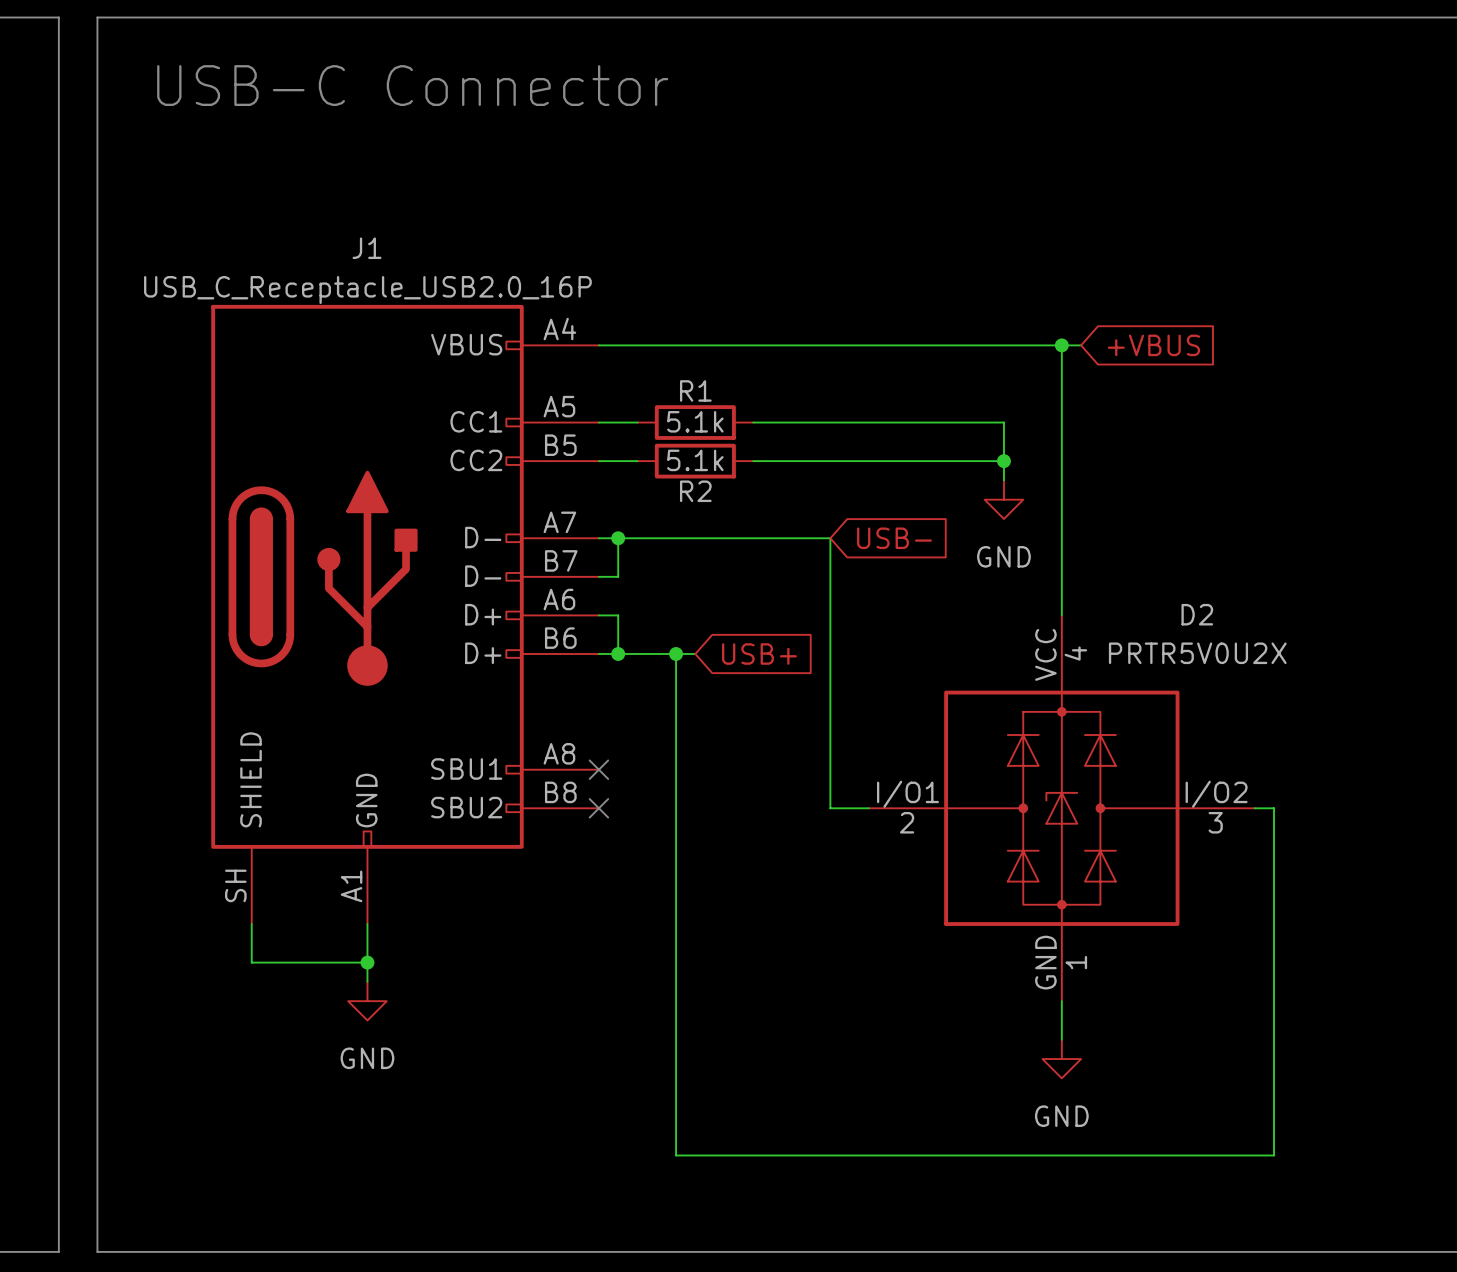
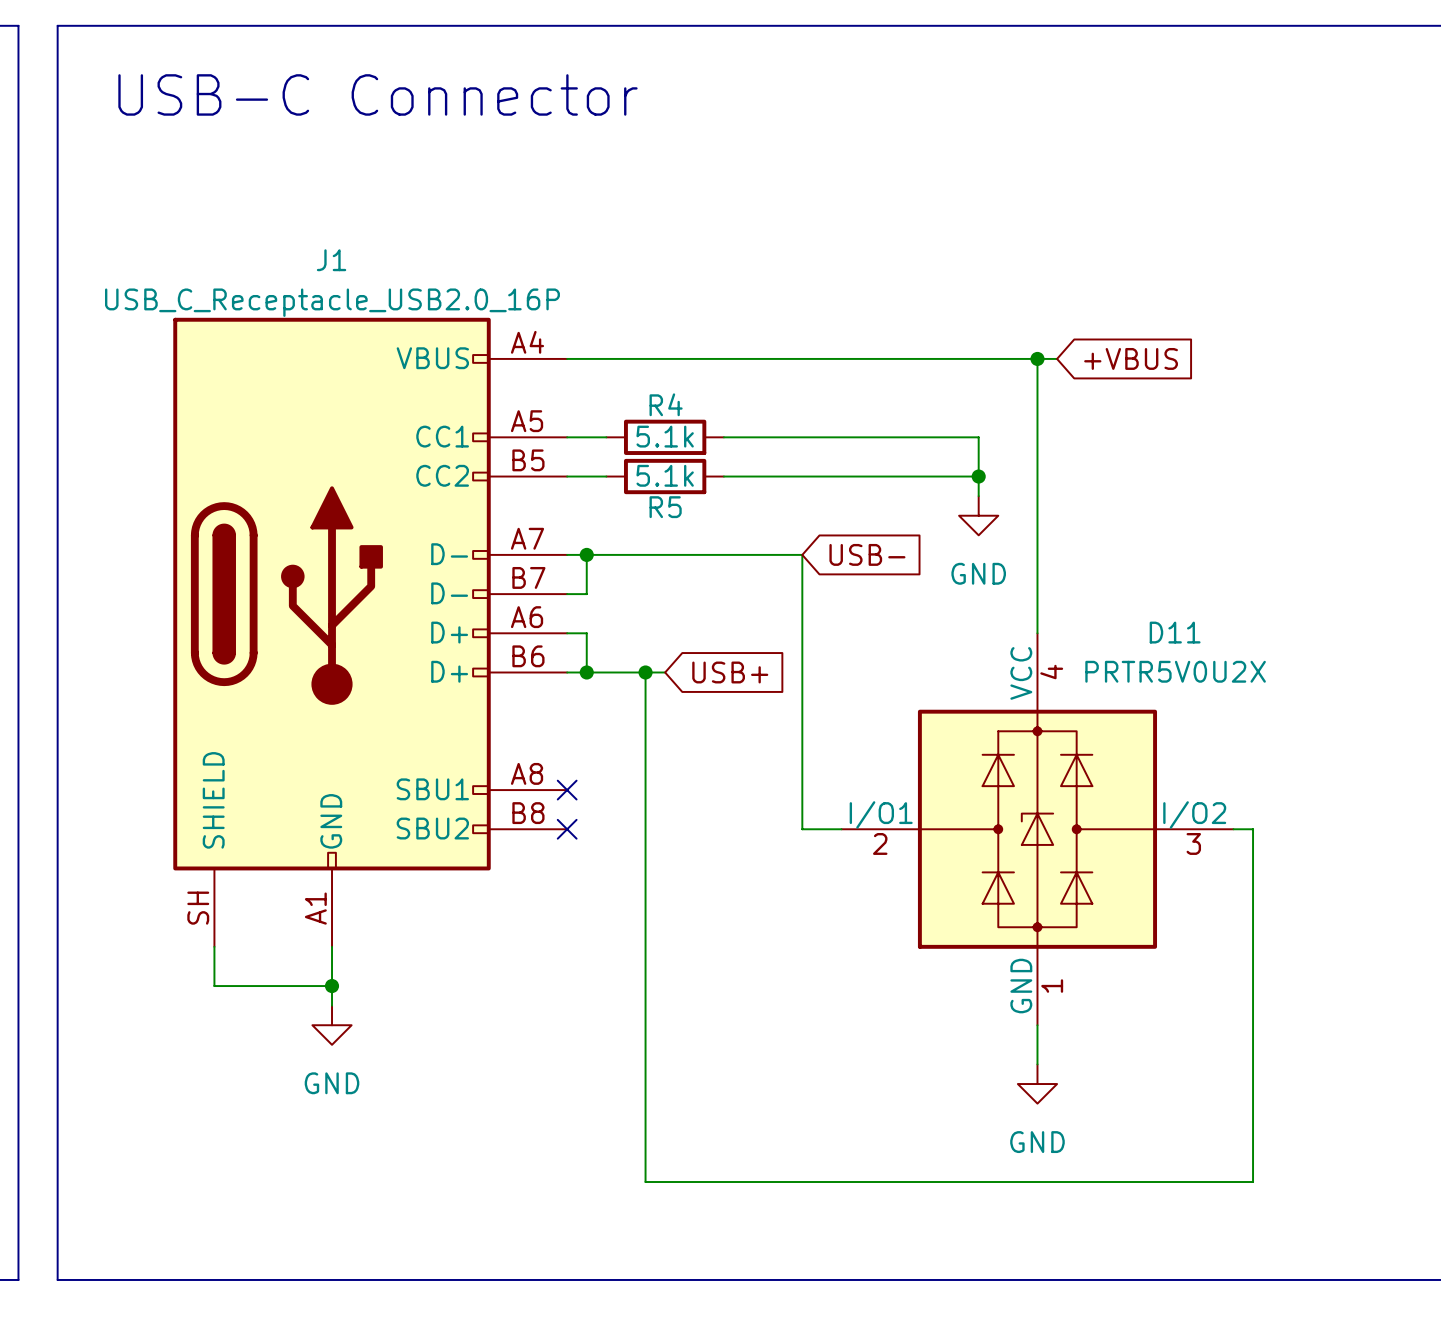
R1 name: R1 (695, 390) -> R4 (666, 404)
R2 name: R2 (695, 491) -> R5 (665, 507)
D2 name: D2 (1197, 614) -> D11 (1175, 632)

